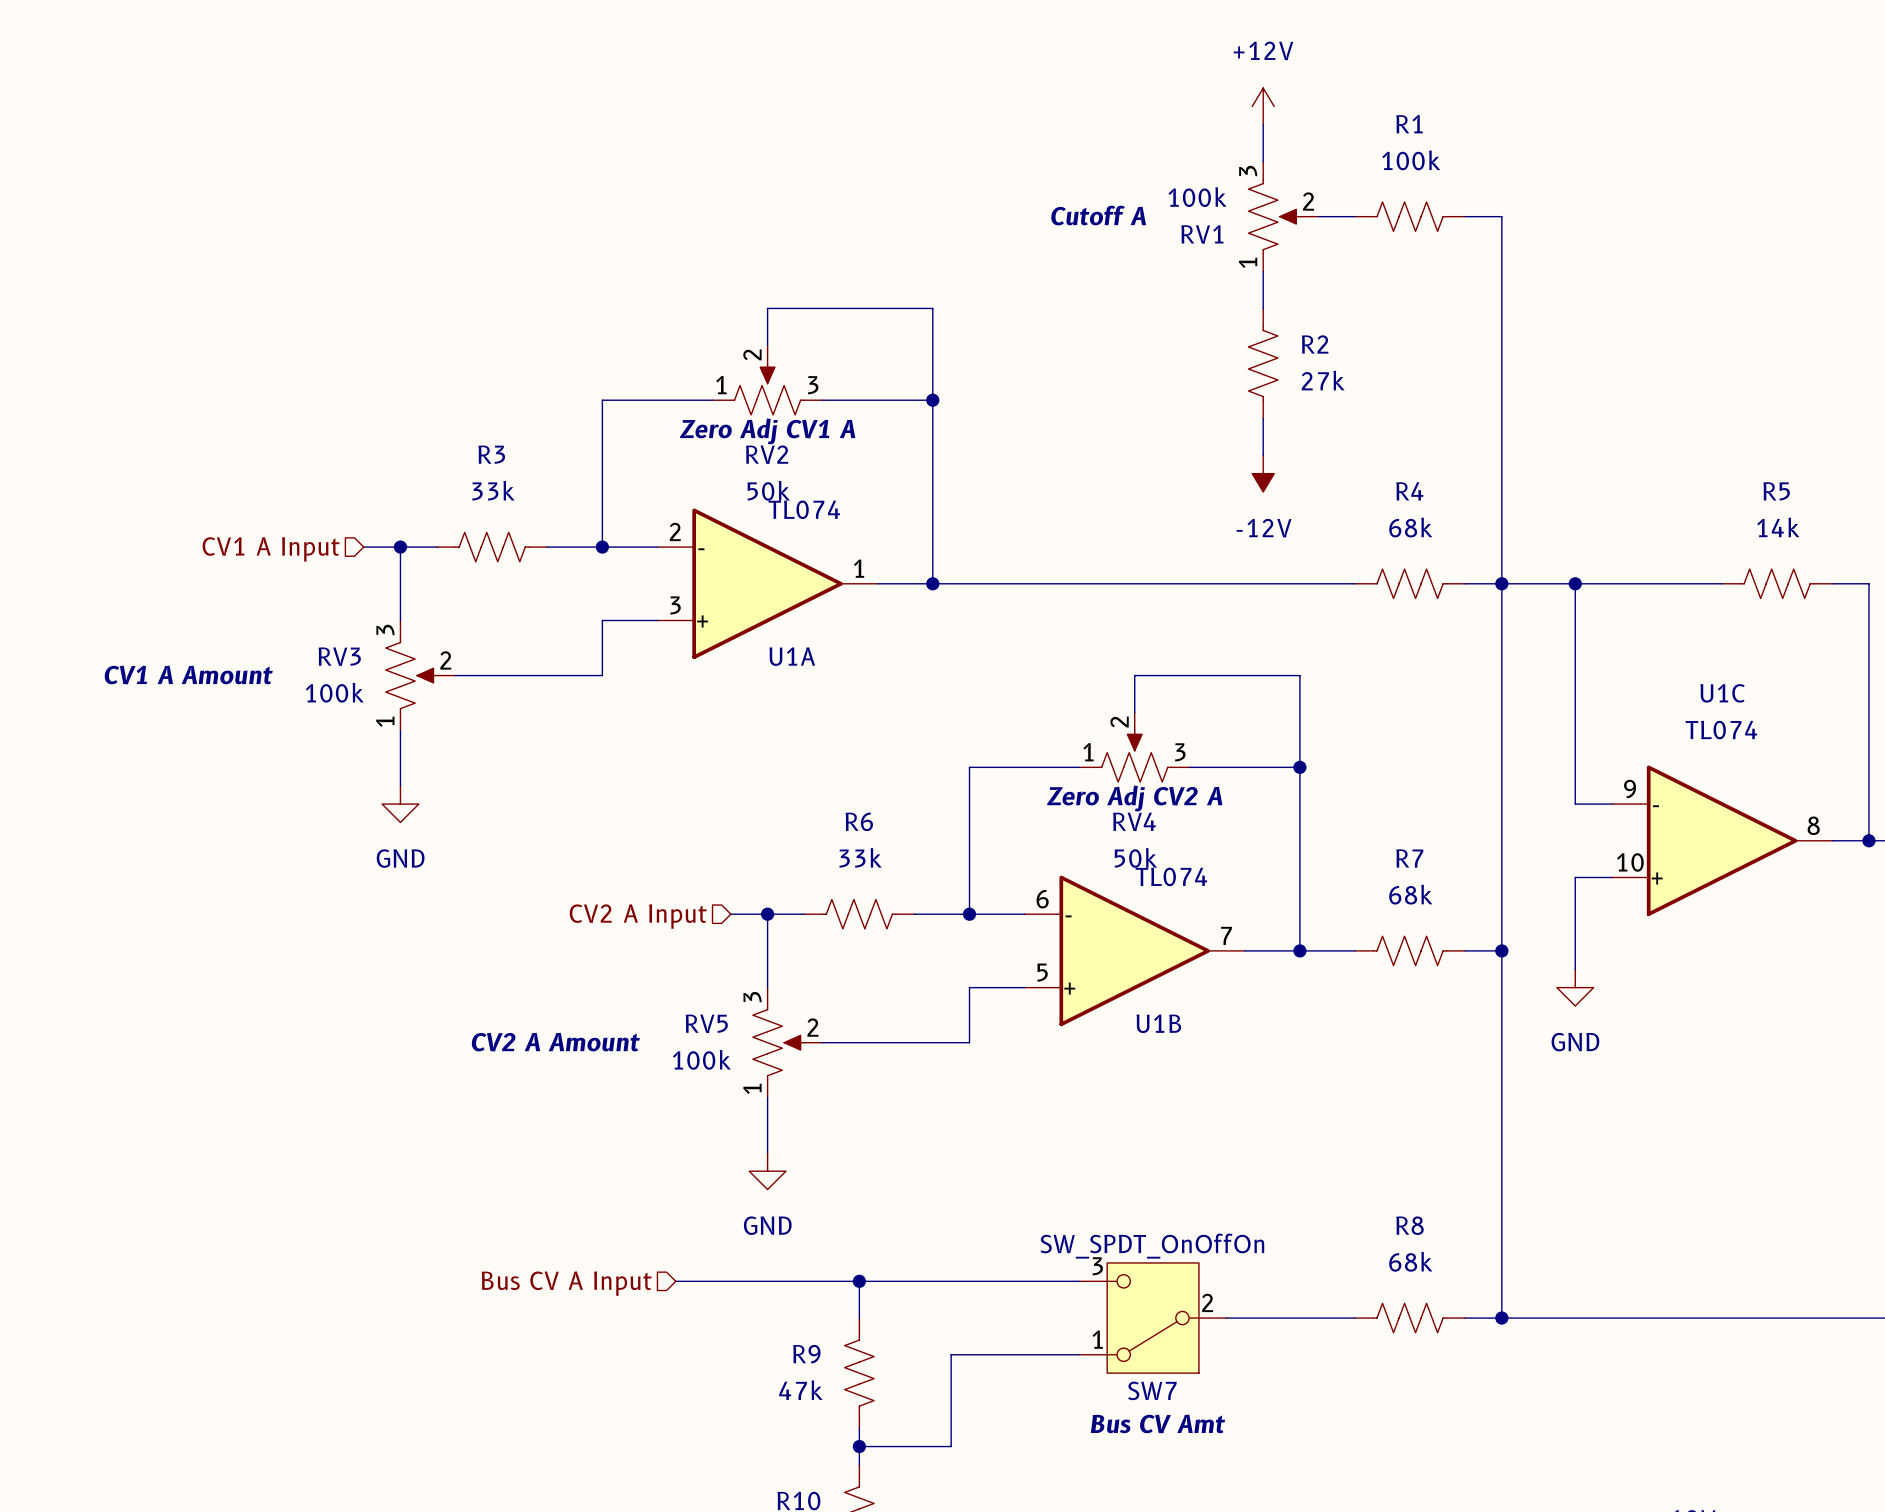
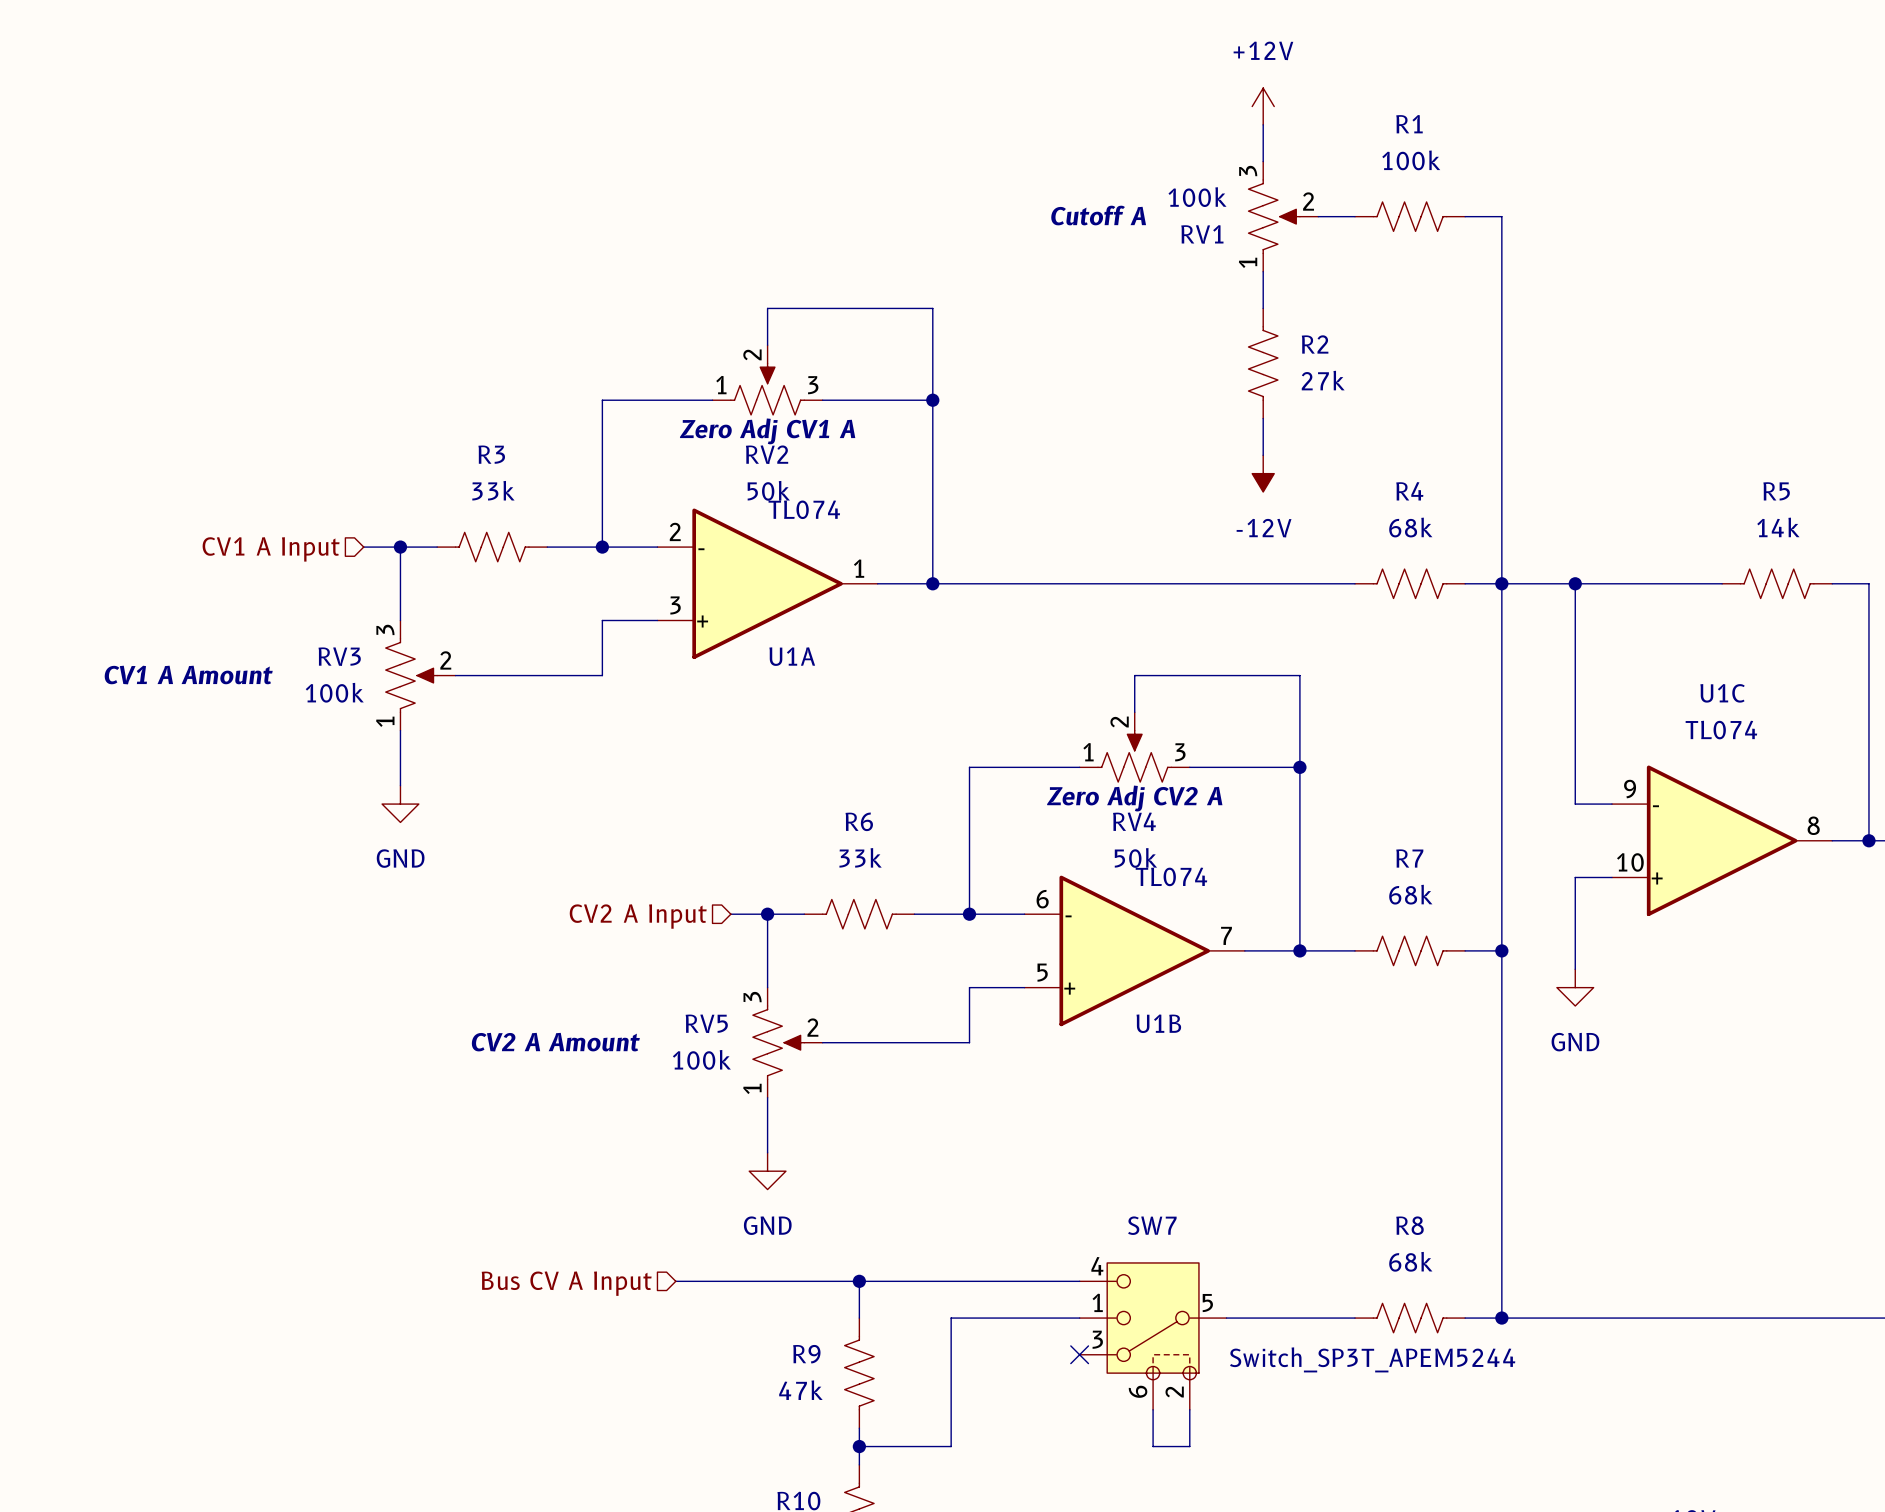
SW7 value: SW_SPDT_OnOffOn (1152, 1246) -> Switch_SP3T_APEM5244 (1372, 1359)
SW7 symbol: [1079, 1262, 1227, 1374] -> [1079, 1262, 1227, 1410]
wire: (951, 1354) (1079, 1354) -> (951, 1354) (951, 1318) (1079, 1318)
no-connect mark: none -> (1079, 1354)
SW7 name position: SW7 (1152, 1390) -> SW7 (1152, 1225)
wire: none -> (1153, 1409) (1153, 1446) (1189, 1446) (1189, 1409)
SW7 text: Bus CV Amt (1158, 1423) -> none

